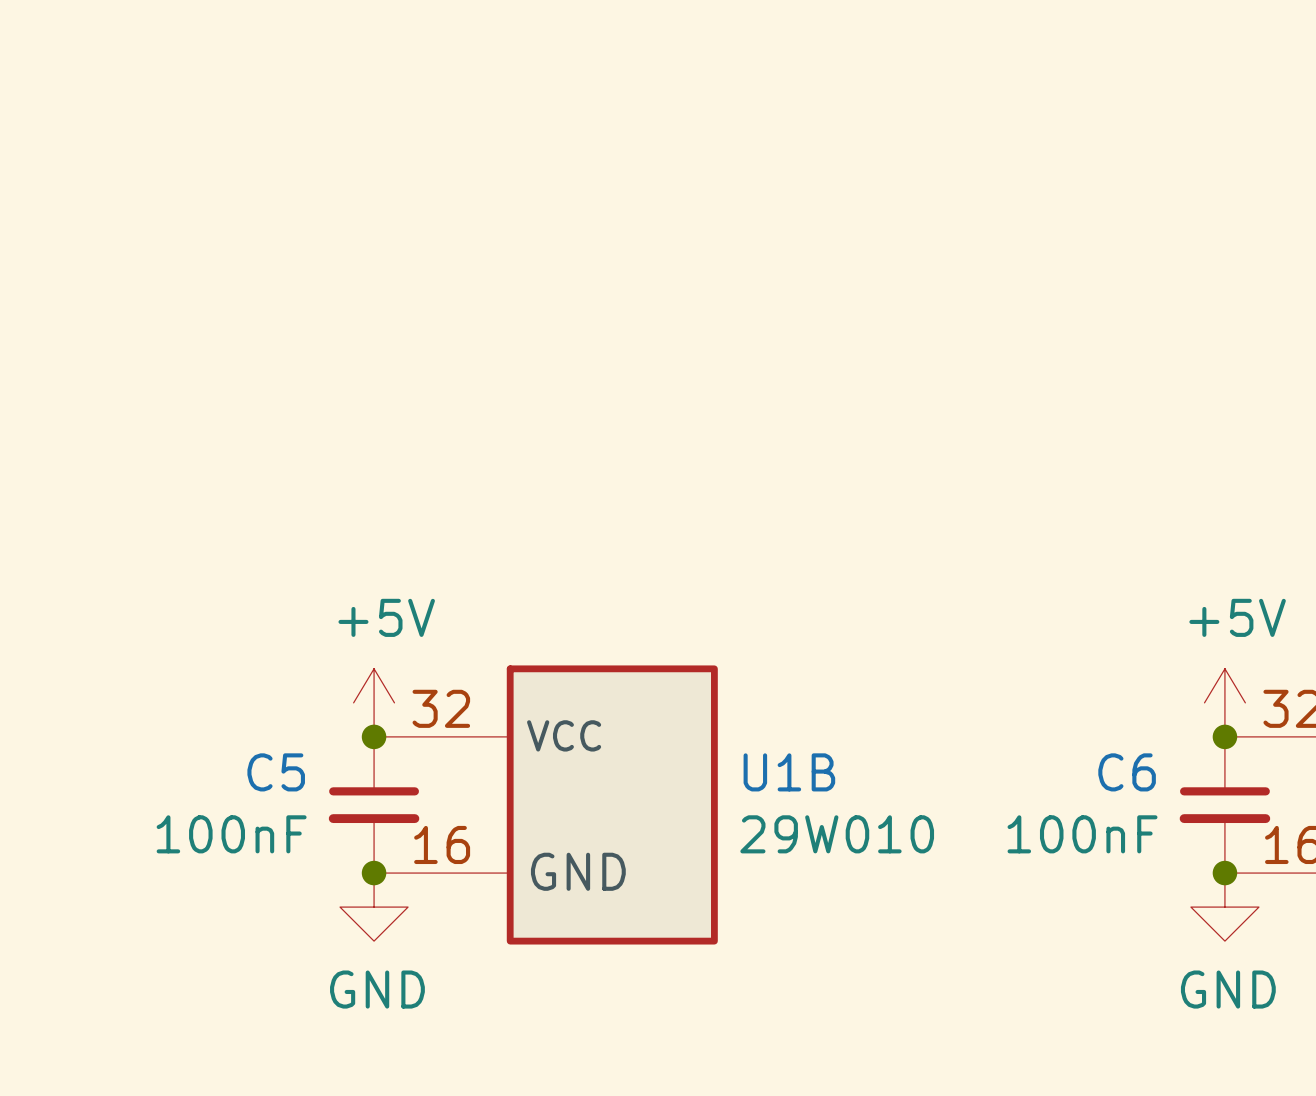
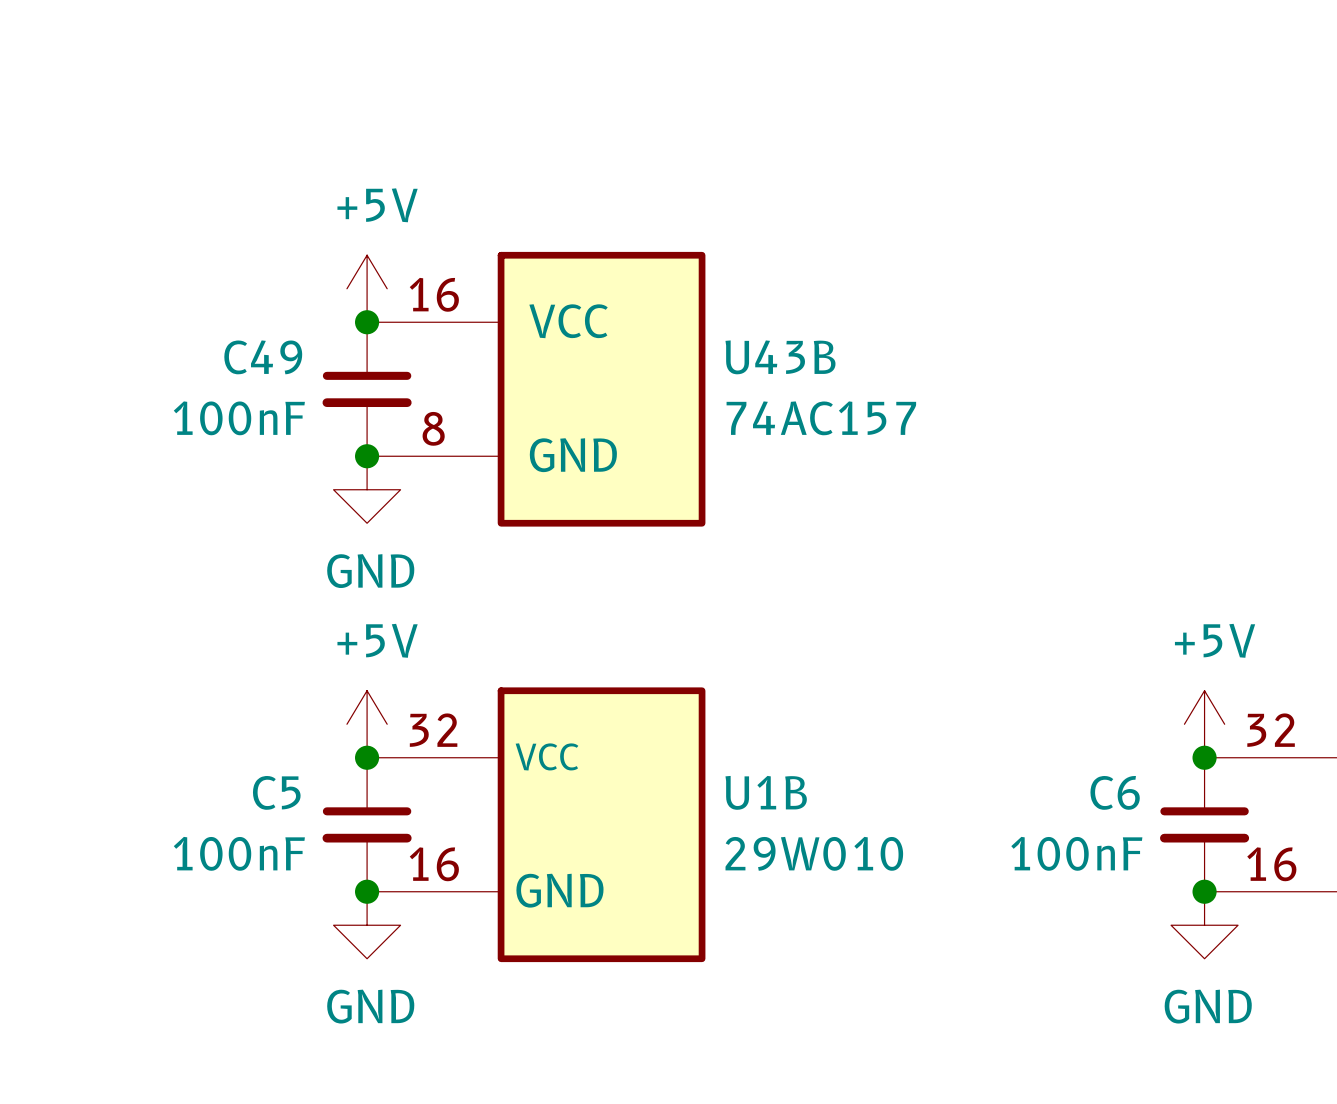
power symbol: none -> +5V (367, 288)
junction: none -> (367, 322)
C49: none -> 100nF (367, 389)
U43B: none -> 74AC157 (536, 389)
junction: none -> (367, 456)
power symbol: none -> GND (367, 489)

